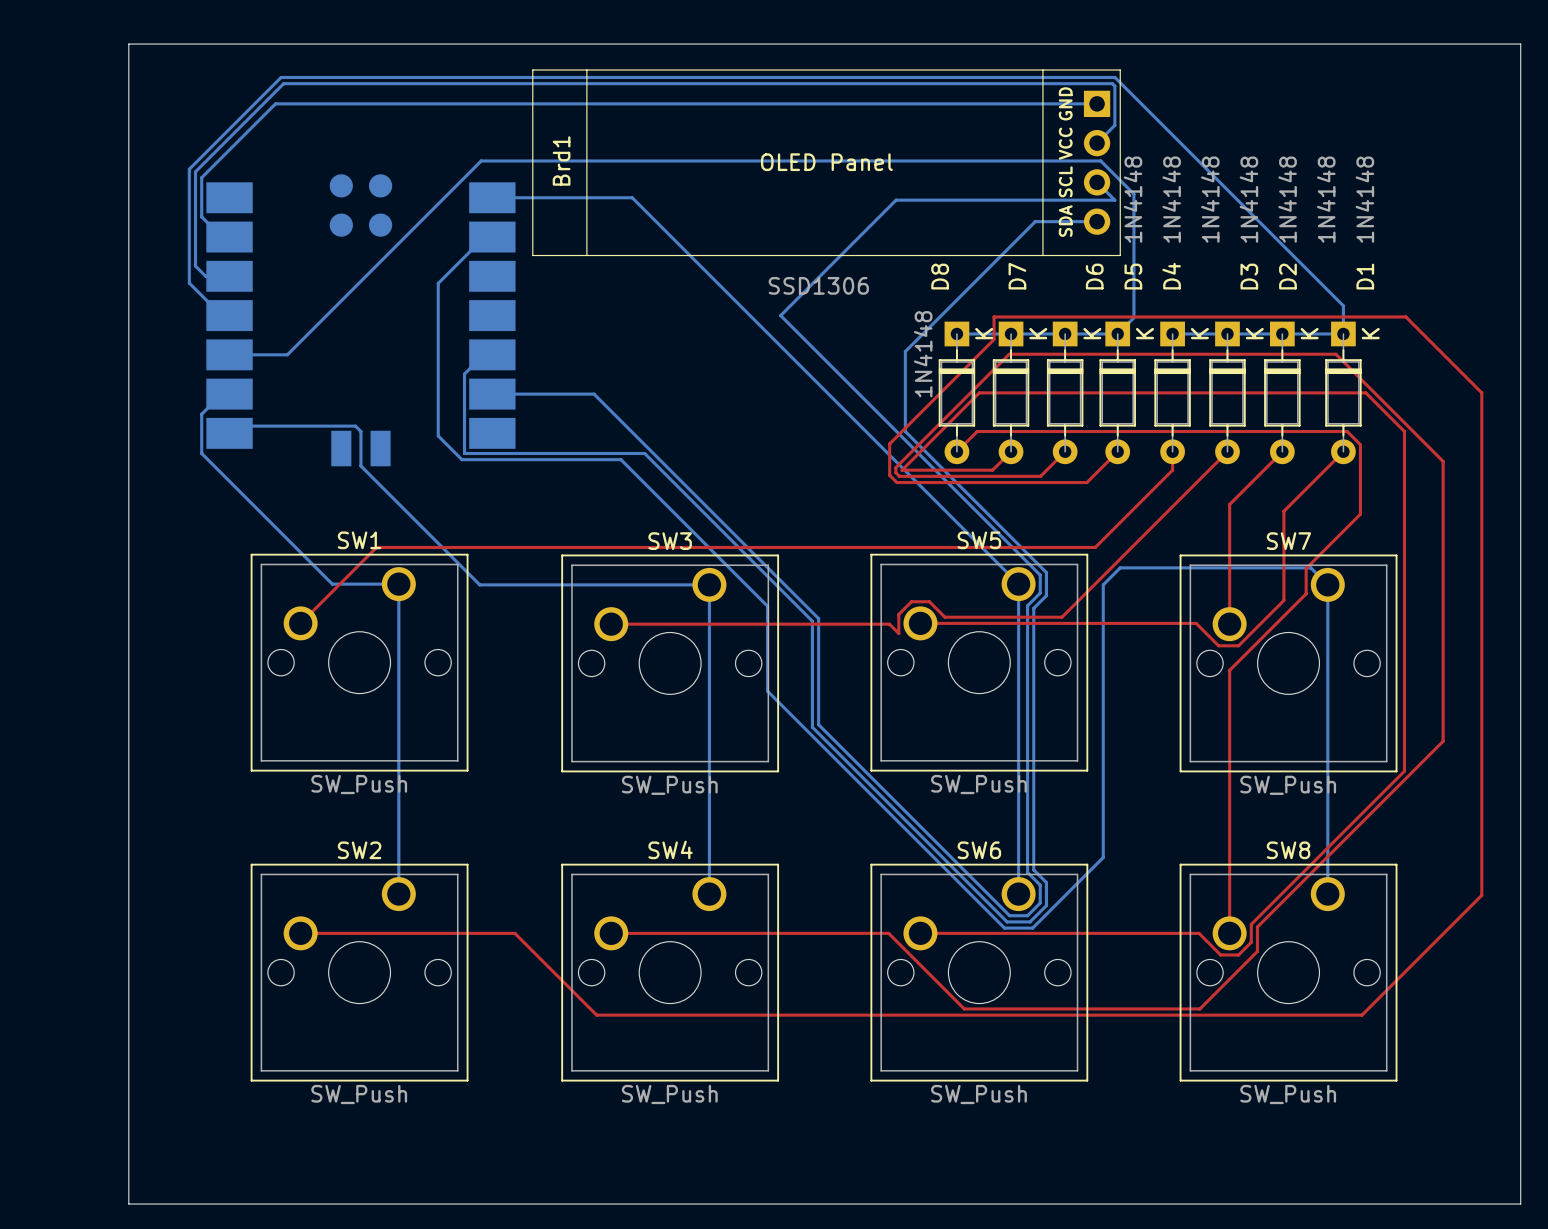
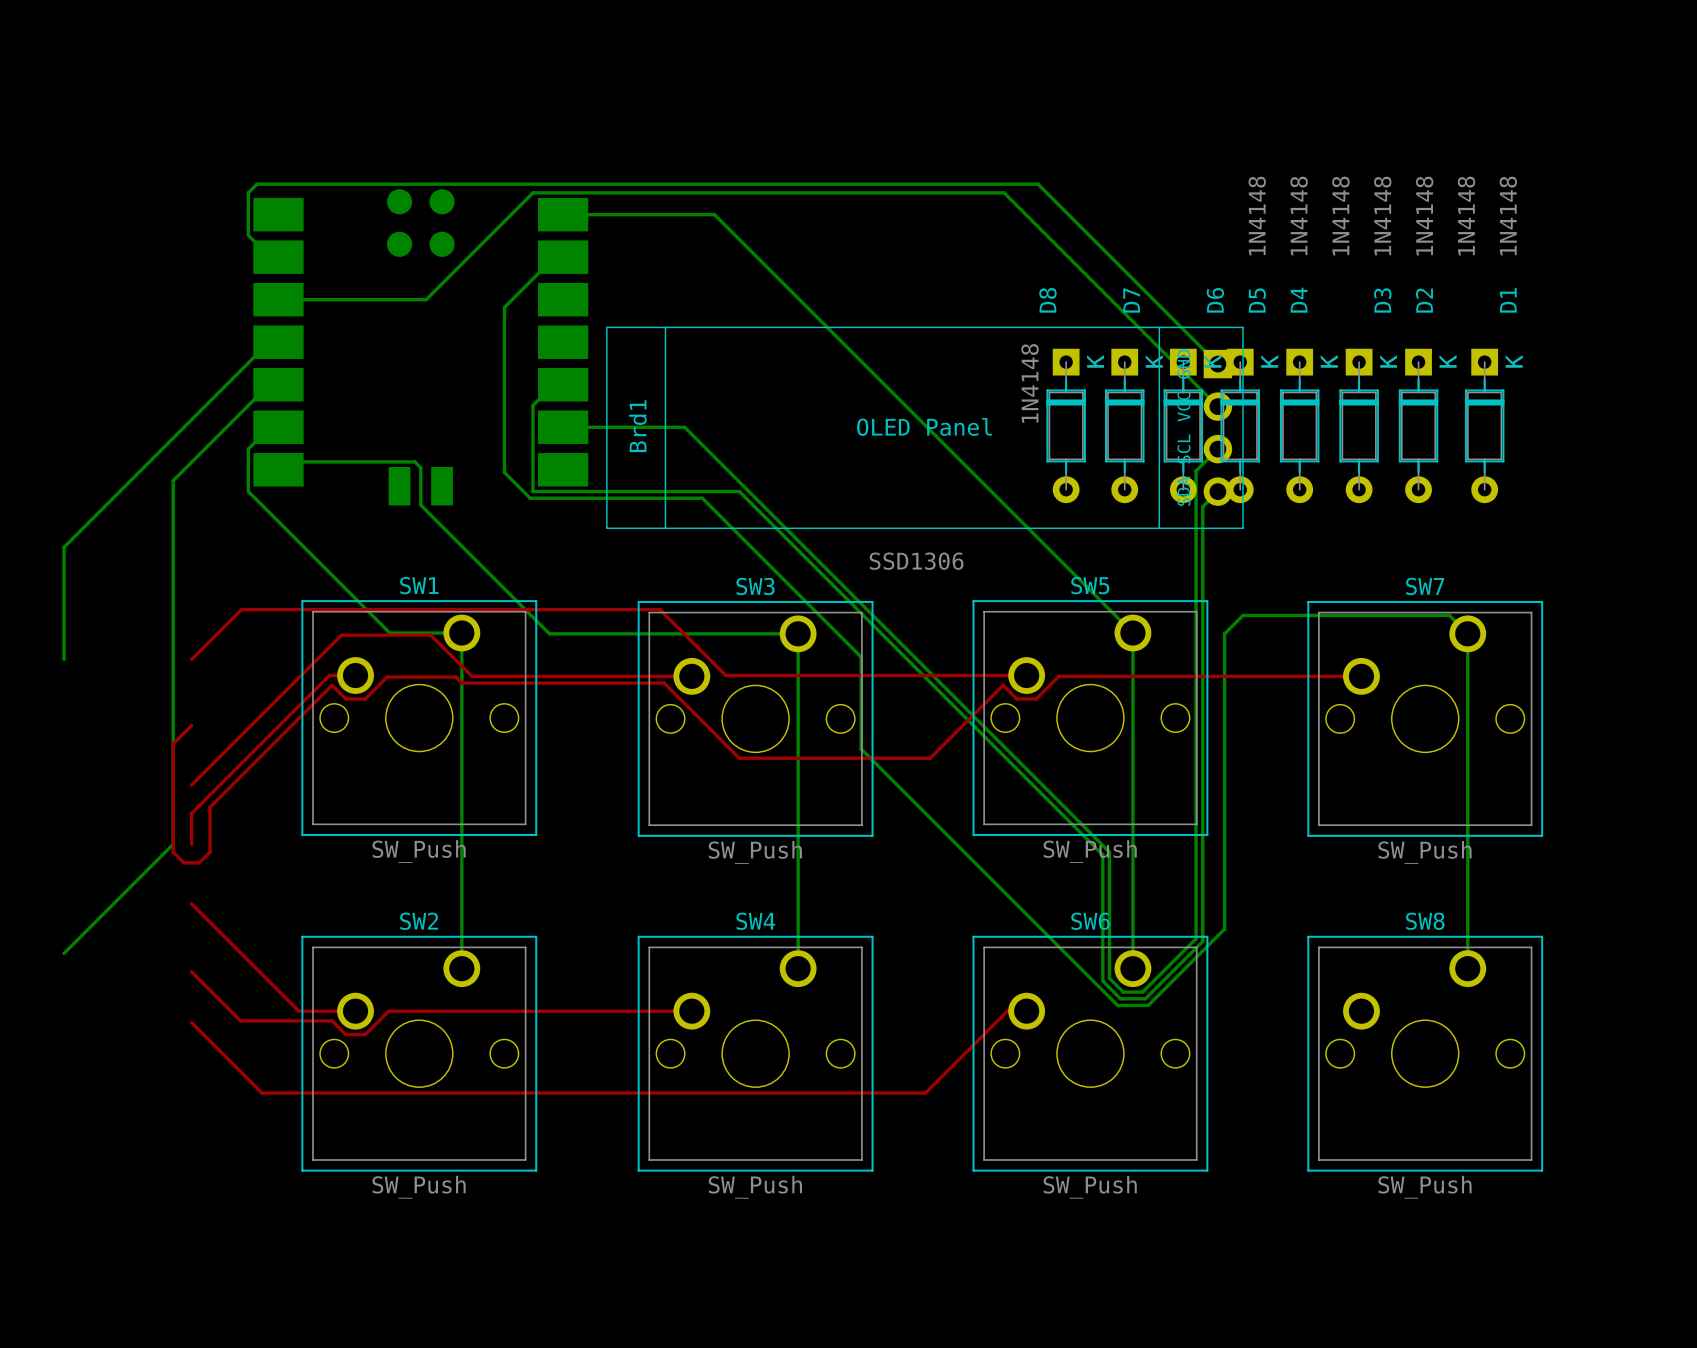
board edge: (128, 44) (1520, 44) (1520, 1204) (128, 1204) (128, 44) -> none
bottom track: (1097, 103) (275, 103) (209, 169) -> (1217, 364) (1038, 184) (257, 184)
bottom track: (1097, 143) (1114, 125) (1114, 86) (1112, 83) (283, 83) (195, 171) (195, 266) (205, 276) (229, 276) -> none
Brd1 position: (826, 162) -> (924, 427)
bottom track: (464, 177) (481, 160) (1100, 160) (1133, 194) (1133, 317) (1117, 333) (956, 333) -> (532, 192) (1004, 192) (1217, 406)
bottom track: (1097, 182) (1114, 200) (896, 200) (780, 315) (1040, 575) (1040, 593) (1027, 605) (1027, 872) (1040, 885) (1040, 903) -> (1217, 449) (1196, 470) (1196, 938) (1156, 978)
bottom track: (1097, 221) (1035, 221) (905, 351) (905, 431) (1046, 572) (1046, 595) (1033, 608) (1033, 869) (1046, 882) (1046, 905) -> (1217, 491) (1202, 506) (1202, 941) (1163, 981)
bottom track: (365, 276) (287, 354) (229, 354) -> (426, 299) (278, 299)
bottom track: (221, 315) (189, 283) (189, 169) (281, 77) (1115, 77) (1343, 305) (1343, 333) (1172, 333) -> (270, 342) (64, 547) (64, 659)
bottom track: none -> (278, 384) (269, 384) (173, 480) (173, 844) (64, 953)
bottom track: (594, 394) (818, 618) (818, 724) (996, 903) -> (673, 427) (684, 427) (1109, 852) (1109, 978)
top track: (956, 451) (977, 431) (1347, 431) (1360, 444) (1360, 514) (1306, 568) (1306, 593) (1229, 670) (1229, 933) -> none
top track: (1011, 451) (992, 470) (902, 470) (979, 392) (1365, 392) (1404, 431) (1404, 771) (1251, 924) (1251, 942) (1238, 955) (1220, 955) (1199, 933) (920, 933) -> (191, 1022) (261, 1093) (925, 1093) (1007, 1011) (1026, 1011)
top track: (1065, 451) (1040, 476) (899, 476) (895, 472) (895, 467) (1009, 354) (1335, 354) (1443, 461) (1443, 741) (1257, 926) (1257, 951) (1199, 1008) (964, 1008) (888, 933) (611, 933) -> none
top track: (1117, 451) (1086, 482) (896, 482) (889, 475) (889, 443) (994, 339) (994, 316) (1405, 316) (1481, 392) (1481, 895) (1361, 1015) (596, 1015) (514, 933) -> (691, 1011) (587, 1011)
top track: (1172, 451) (1172, 470) (1095, 547) (376, 547) (300, 623) -> (191, 844) (191, 813) (329, 675) (355, 675)
top track: (1227, 451) (1062, 617) (944, 617) (929, 601) (911, 601) (898, 614) (898, 633) (889, 624) (611, 624) -> (191, 785) (341, 635) (430, 635) (472, 676) (691, 676)
top track: (1282, 451) (1229, 504) (1229, 624) -> (191, 725) (173, 744) (173, 852) (183, 862) (199, 862) (210, 852) (210, 807) (332, 685) (345, 698) (365, 698) (387, 677) (455, 677) (461, 683) (664, 683) (739, 758) (930, 758) (1003, 685) (1016, 698) (1036, 698) (1058, 676) (1361, 676)
top track: (1343, 451) (1283, 511) (1283, 600) (1238, 645) (1218, 645) (1196, 623) (920, 623) -> (191, 659) (241, 609) (659, 609) (725, 675) (1026, 675)
bottom track: (644, 453) (812, 621) (812, 727) (990, 905) -> (728, 491) (739, 491) (1102, 854) (1102, 981)
top track: none -> (191, 903) (298, 1011) (355, 1011)
top track: (300, 933) (331, 933) -> (191, 971) (240, 1020) (332, 1020) (345, 1034) (365, 1034) (388, 1011)

